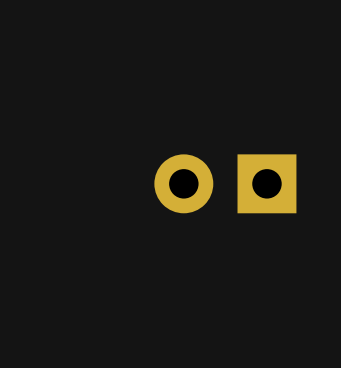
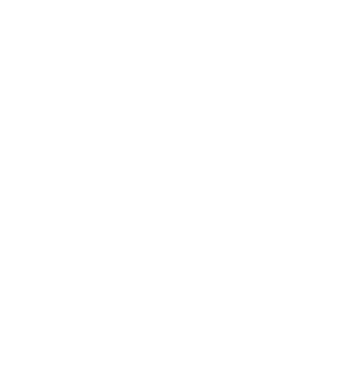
part: (225, 183) -> none

